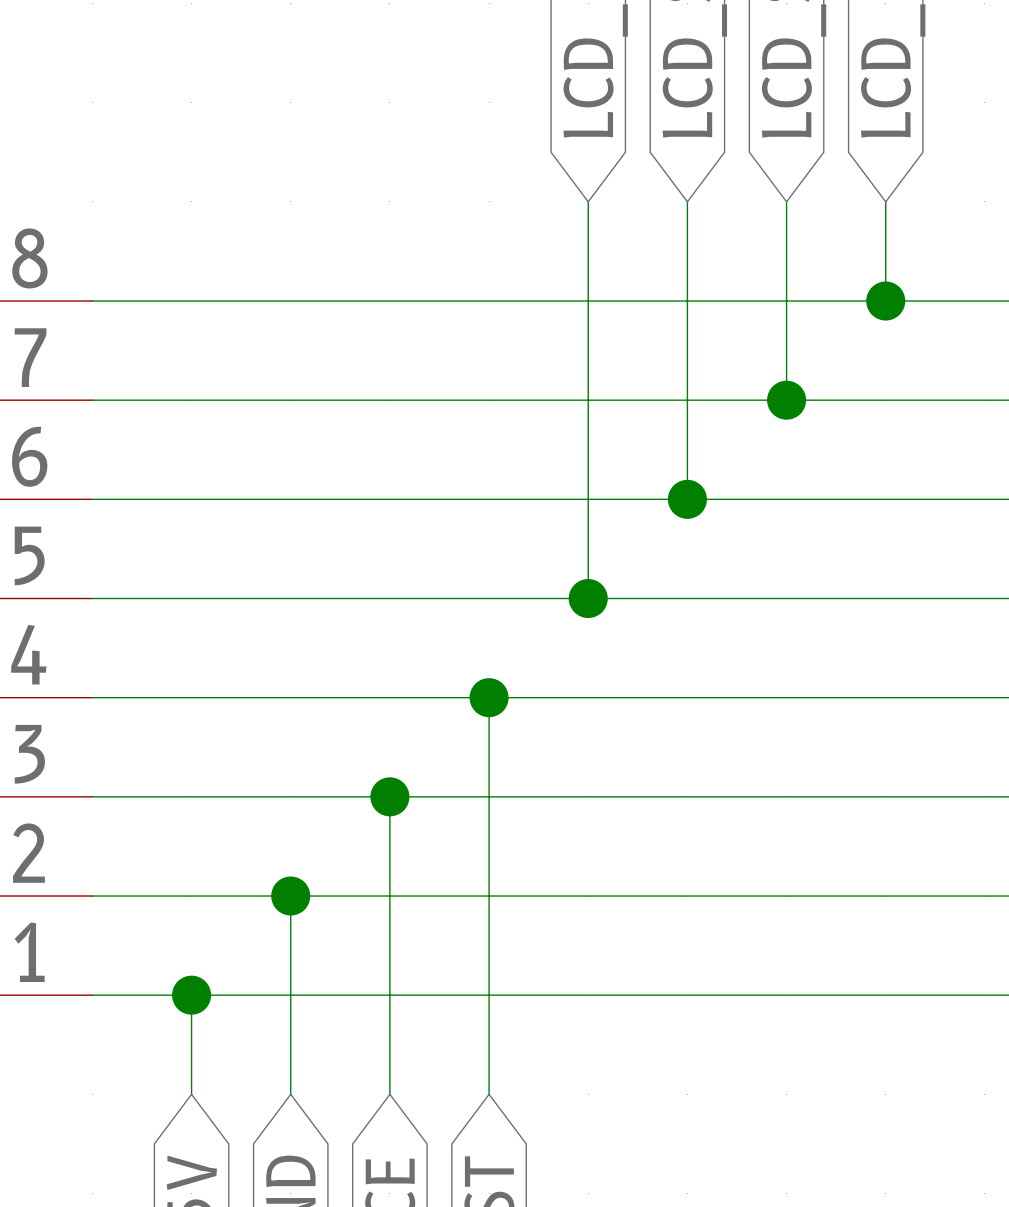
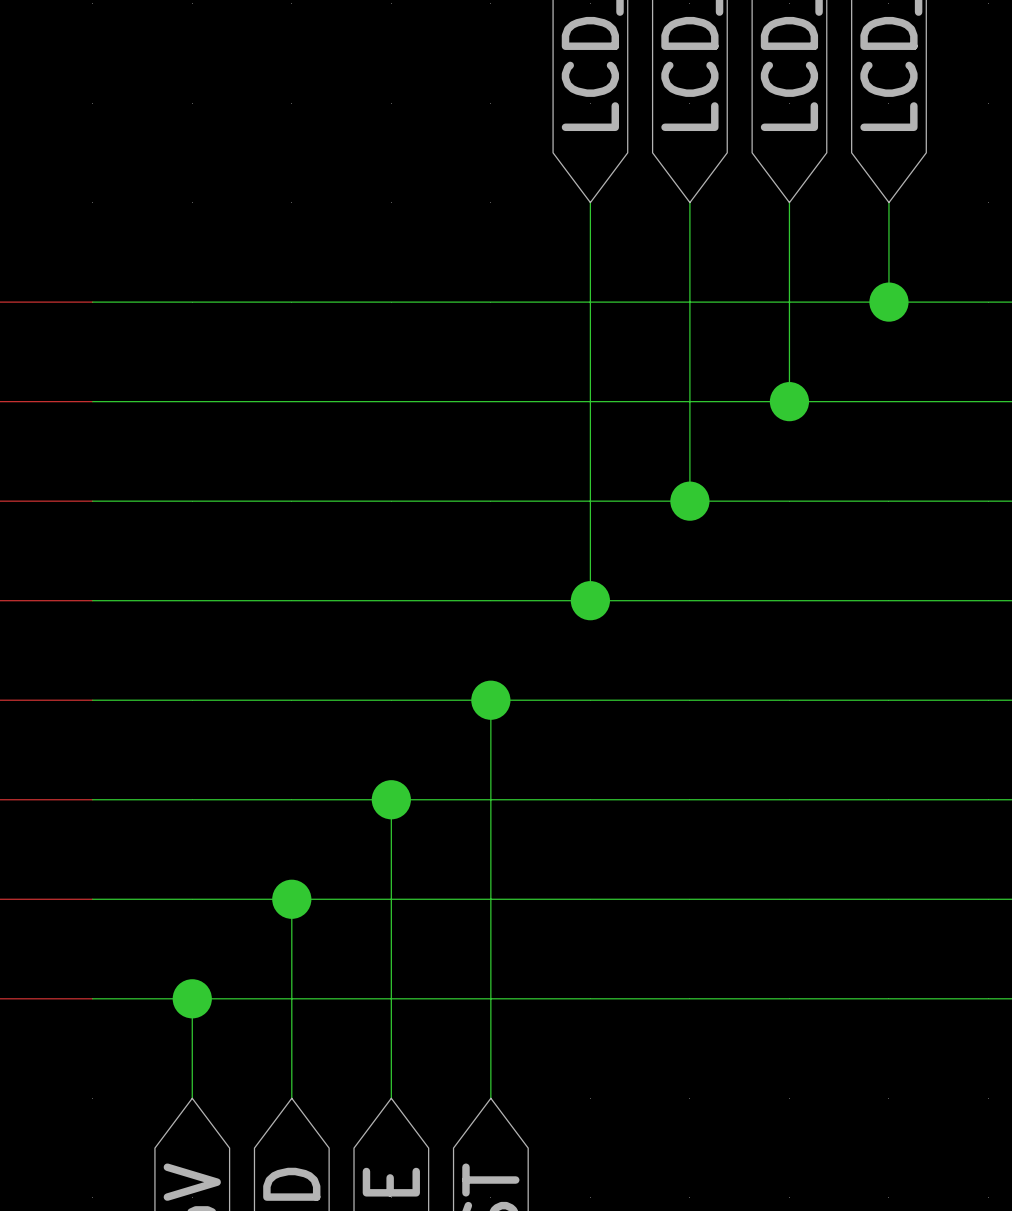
part pin number: 8 (29, 258) -> none
part pin number: 7 (30, 357) -> none
part pin number: 6 (29, 456) -> none
part pin number: 5 (29, 555) -> none
part pin number: 4 (28, 654) -> none
part pin number: 3 (29, 754) -> none
part pin number: 2 (28, 853) -> none
part pin number: 1 (29, 952) -> none

